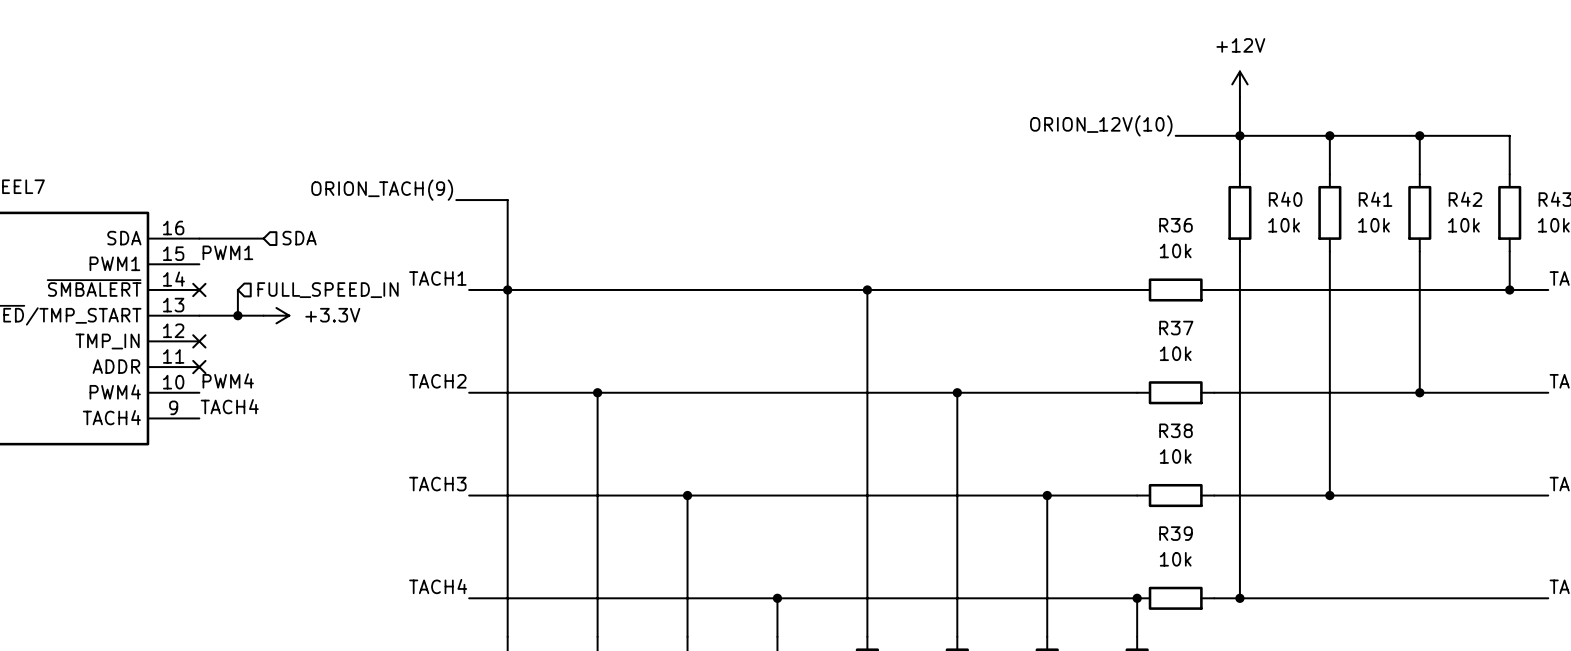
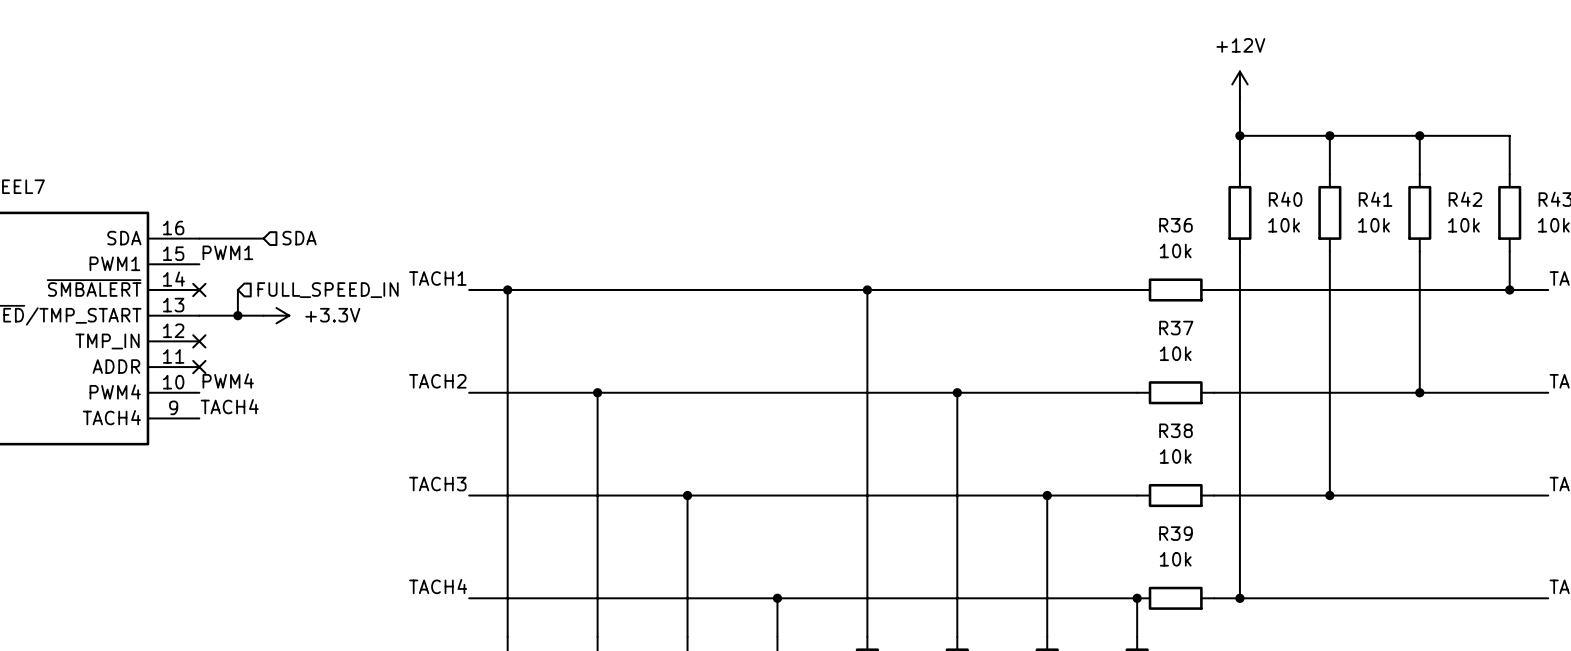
label: ORION_12V(10) (1101, 125) -> none
wire: (1175, 135) (1239, 135) -> none
label: ORION_TACH(9) (382, 190) -> none
wire: (456, 200) (507, 200) (507, 289) -> none

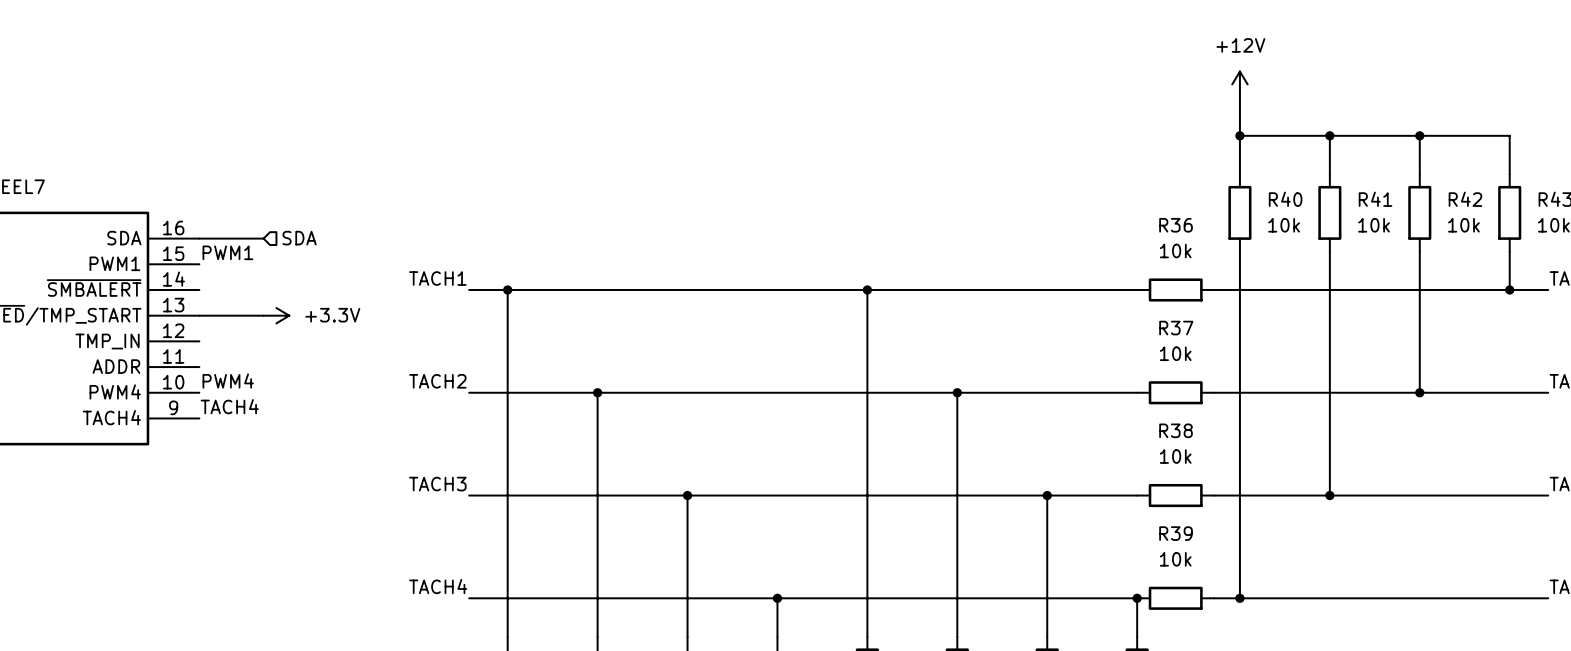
no-connect mark: (199, 289) -> none
wire: (237, 289) (237, 315) -> none
hierarchical label: FULL_SPEED_IN (328, 290) -> none
junction: (237, 315) -> none
no-connect mark: (199, 341) -> none
no-connect mark: (199, 367) -> none

